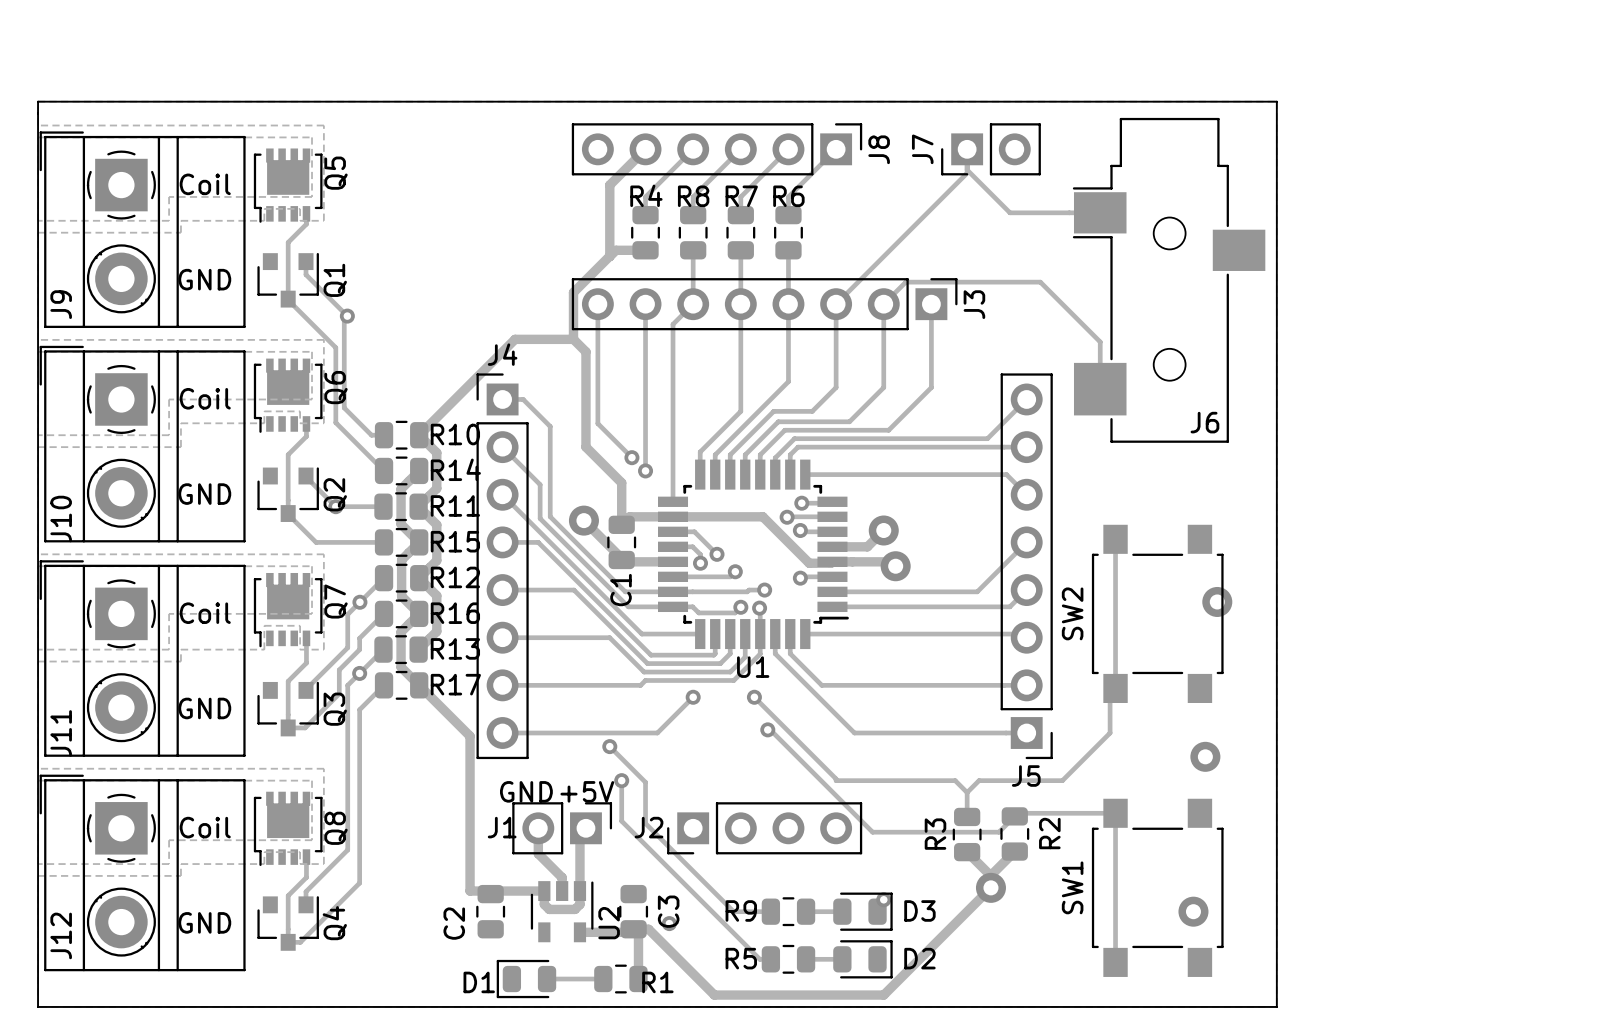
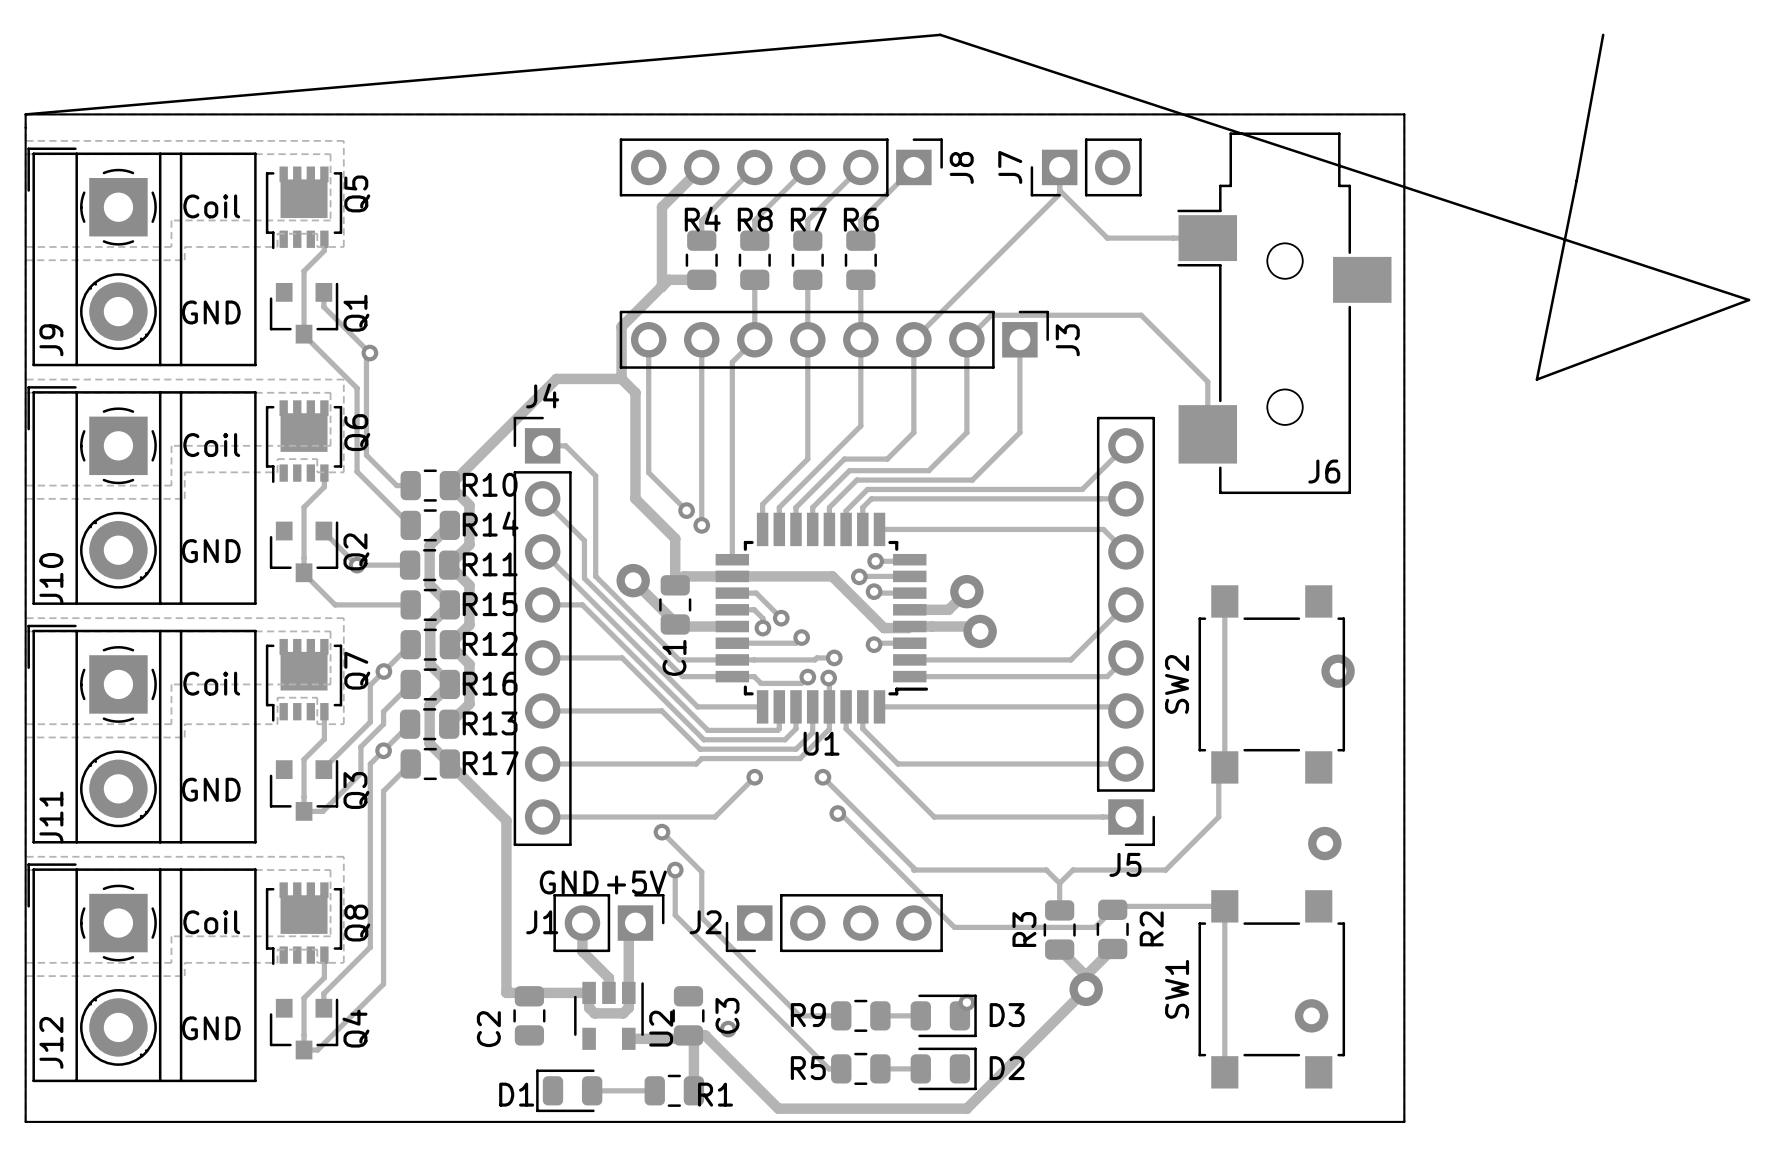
line: none -> (1603, 34) (1576, 180) (1536, 379) (1749, 300) (940, 34) (25, 114)

